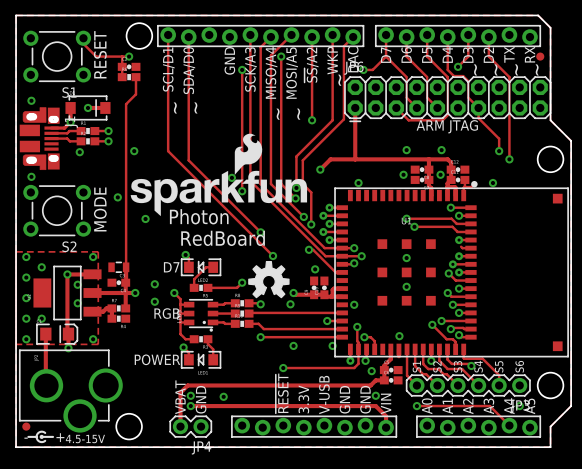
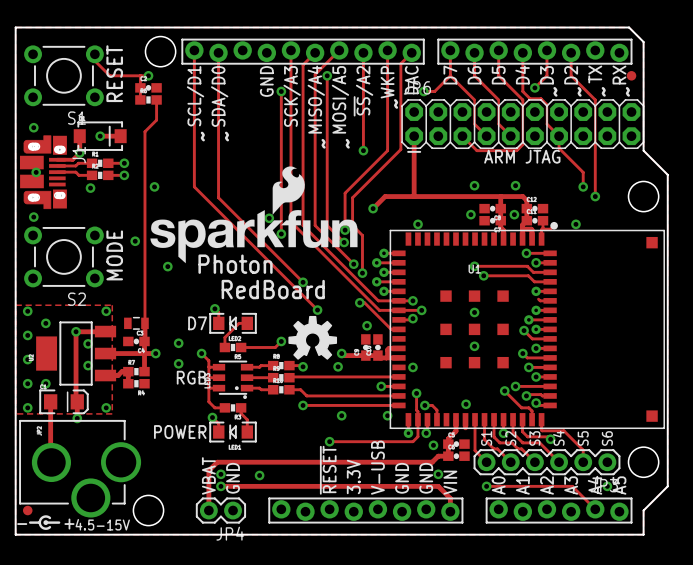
via: none -> (36, 172)

